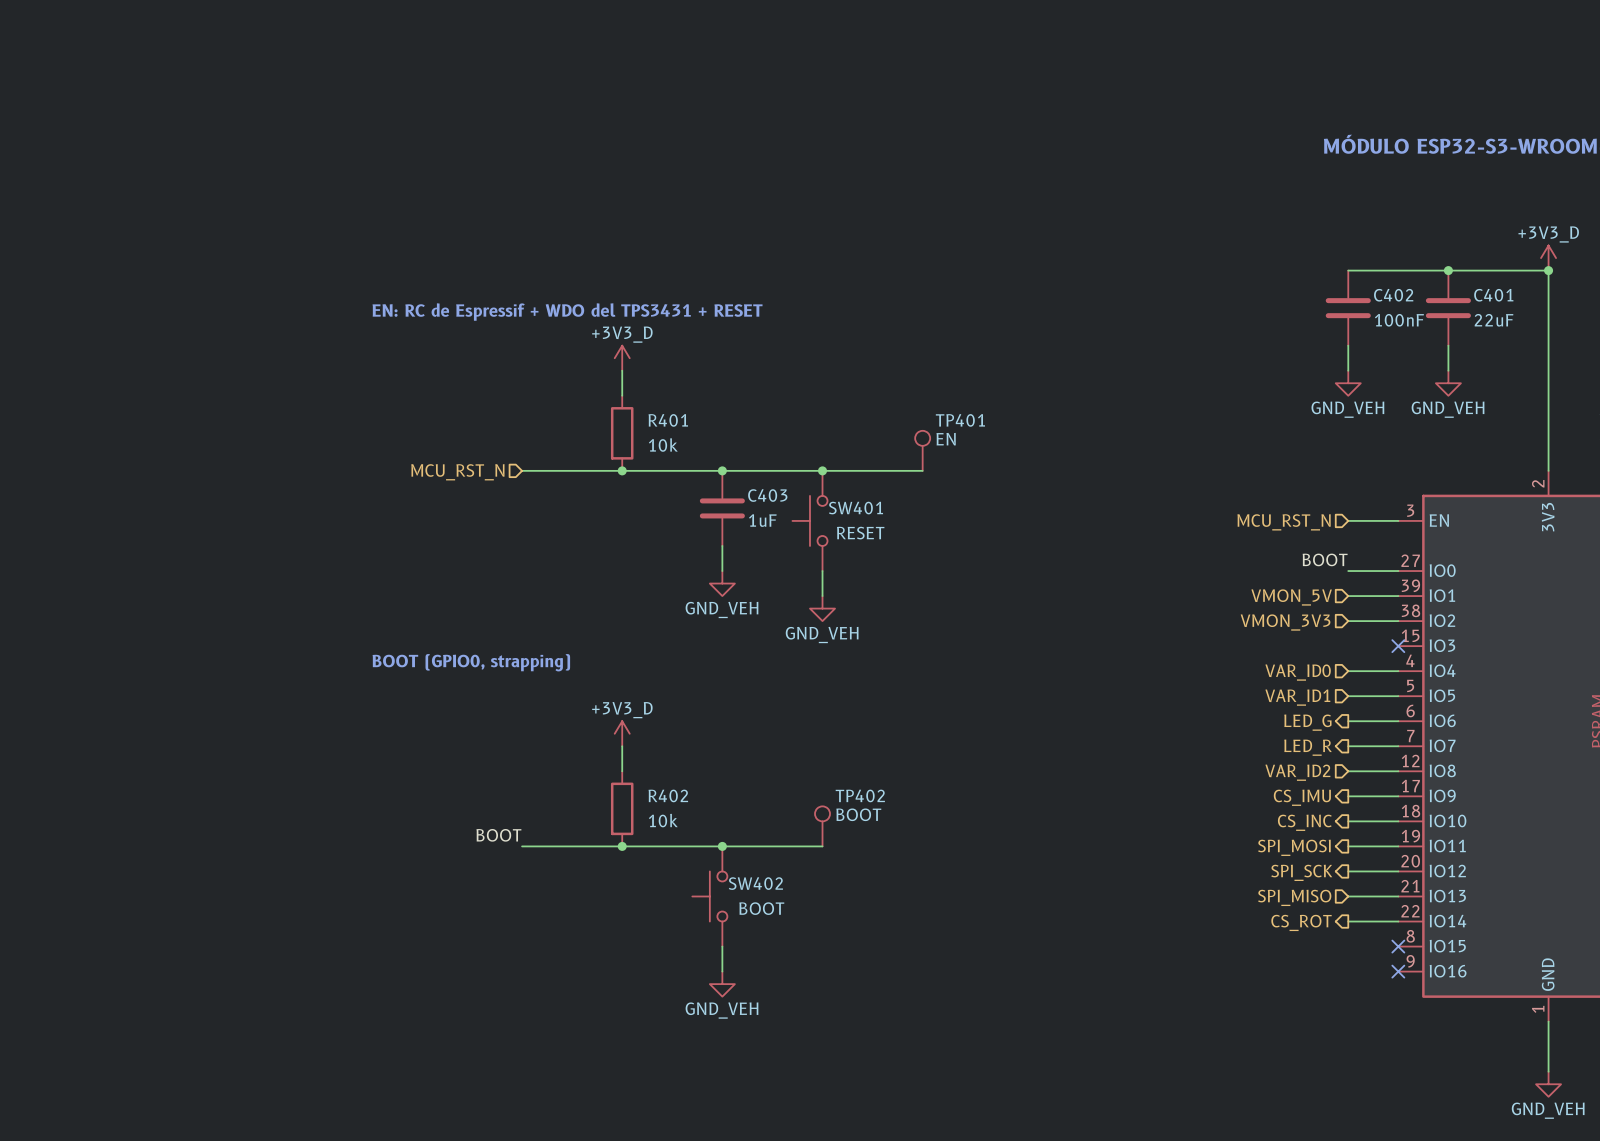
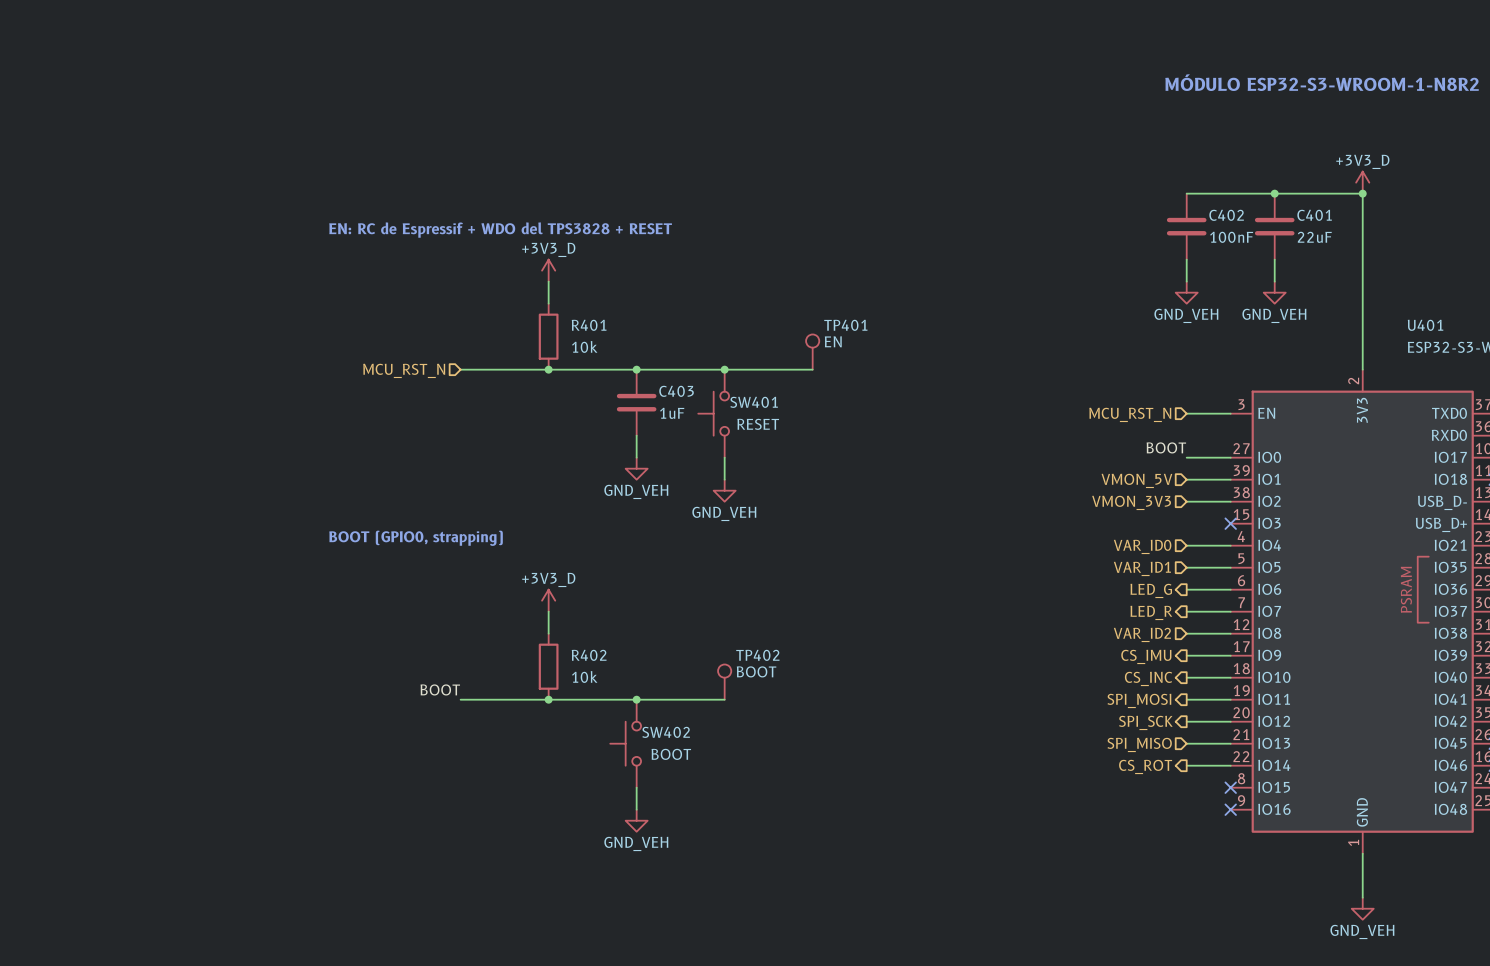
text: EN: RC de Espressif + WDO del TPS3431 + RESET (567, 312) -> EN: RC de Espressif + WDO del TPS3828 + RESET (500, 230)

